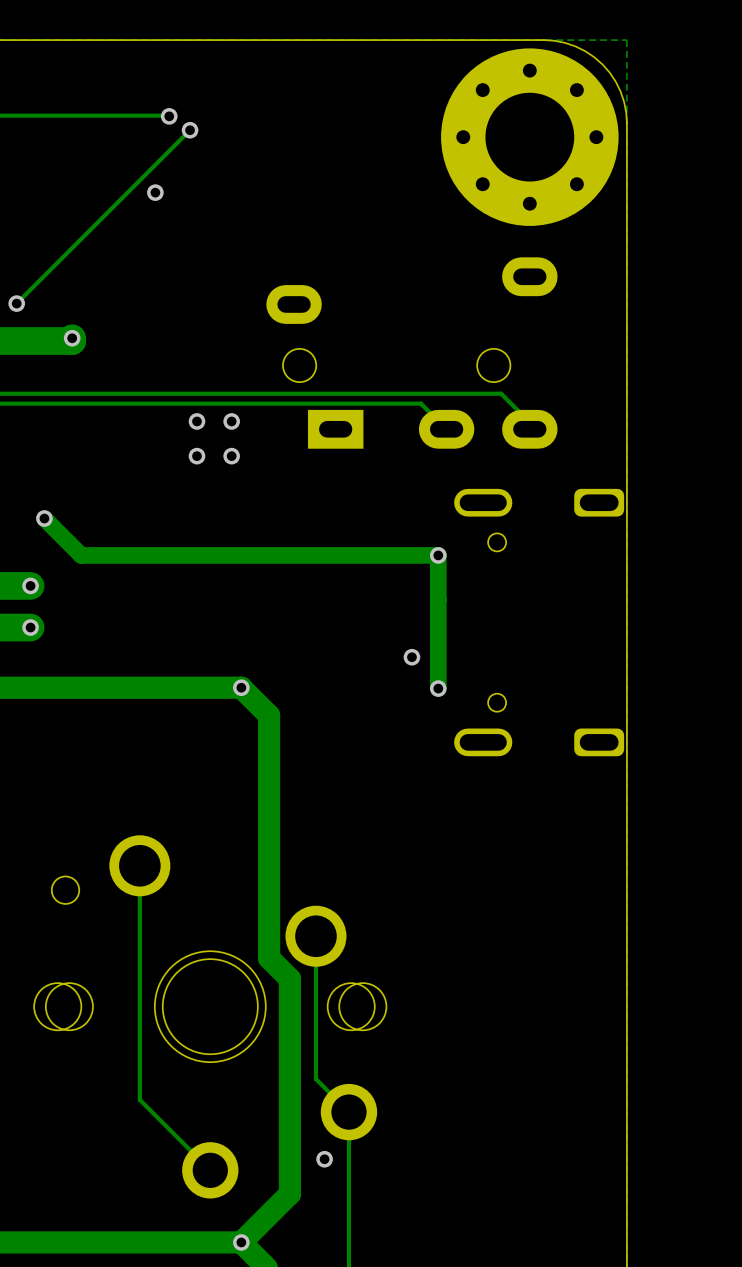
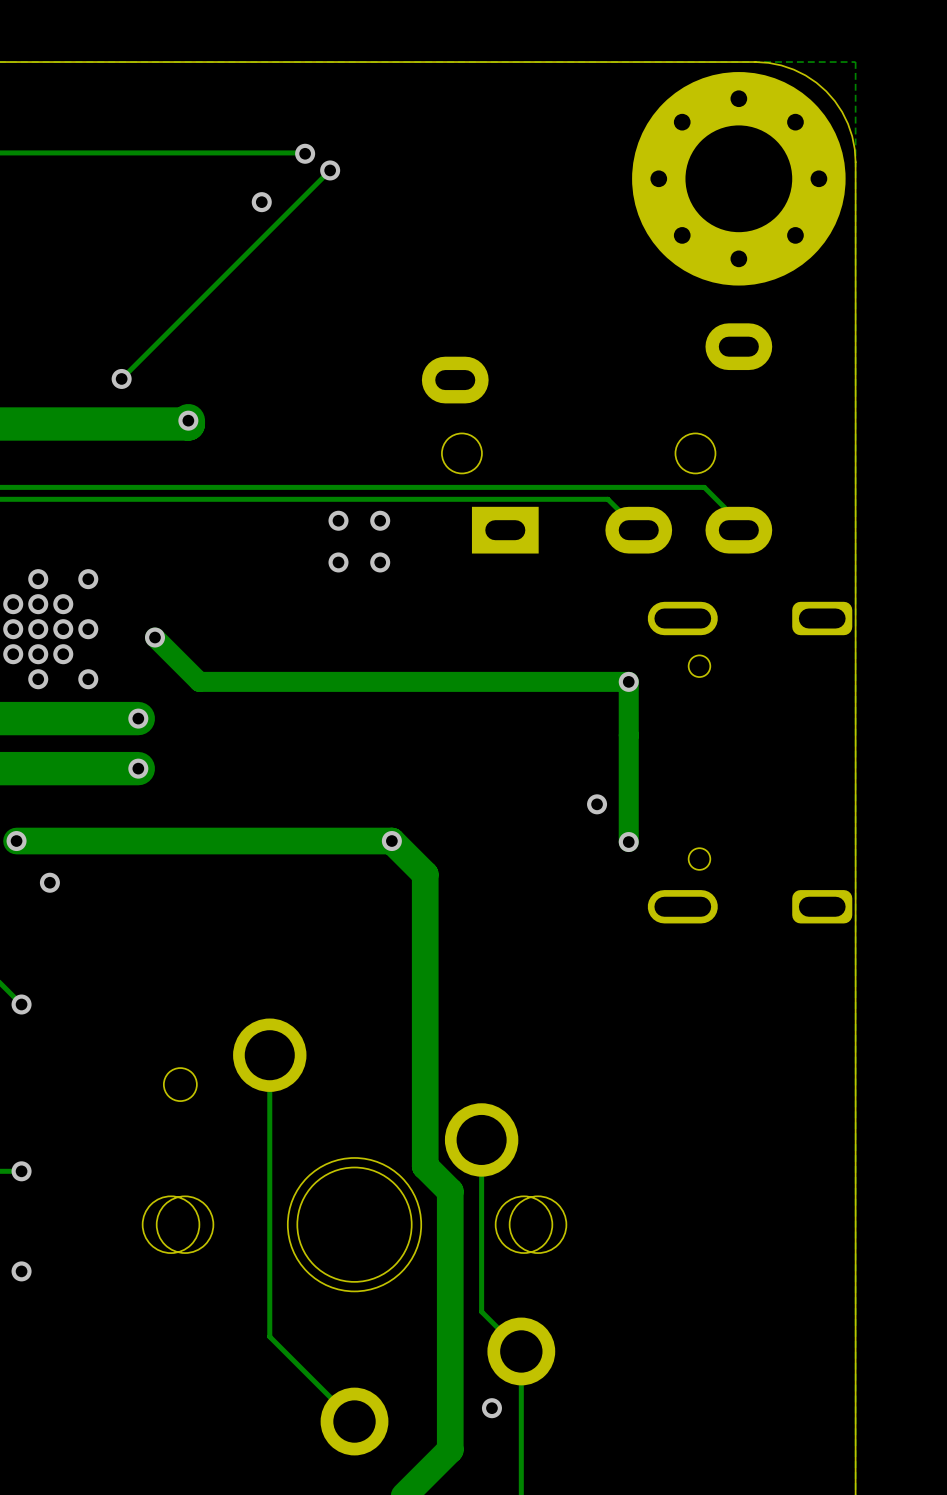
via position: (155, 192) -> (261, 202)

